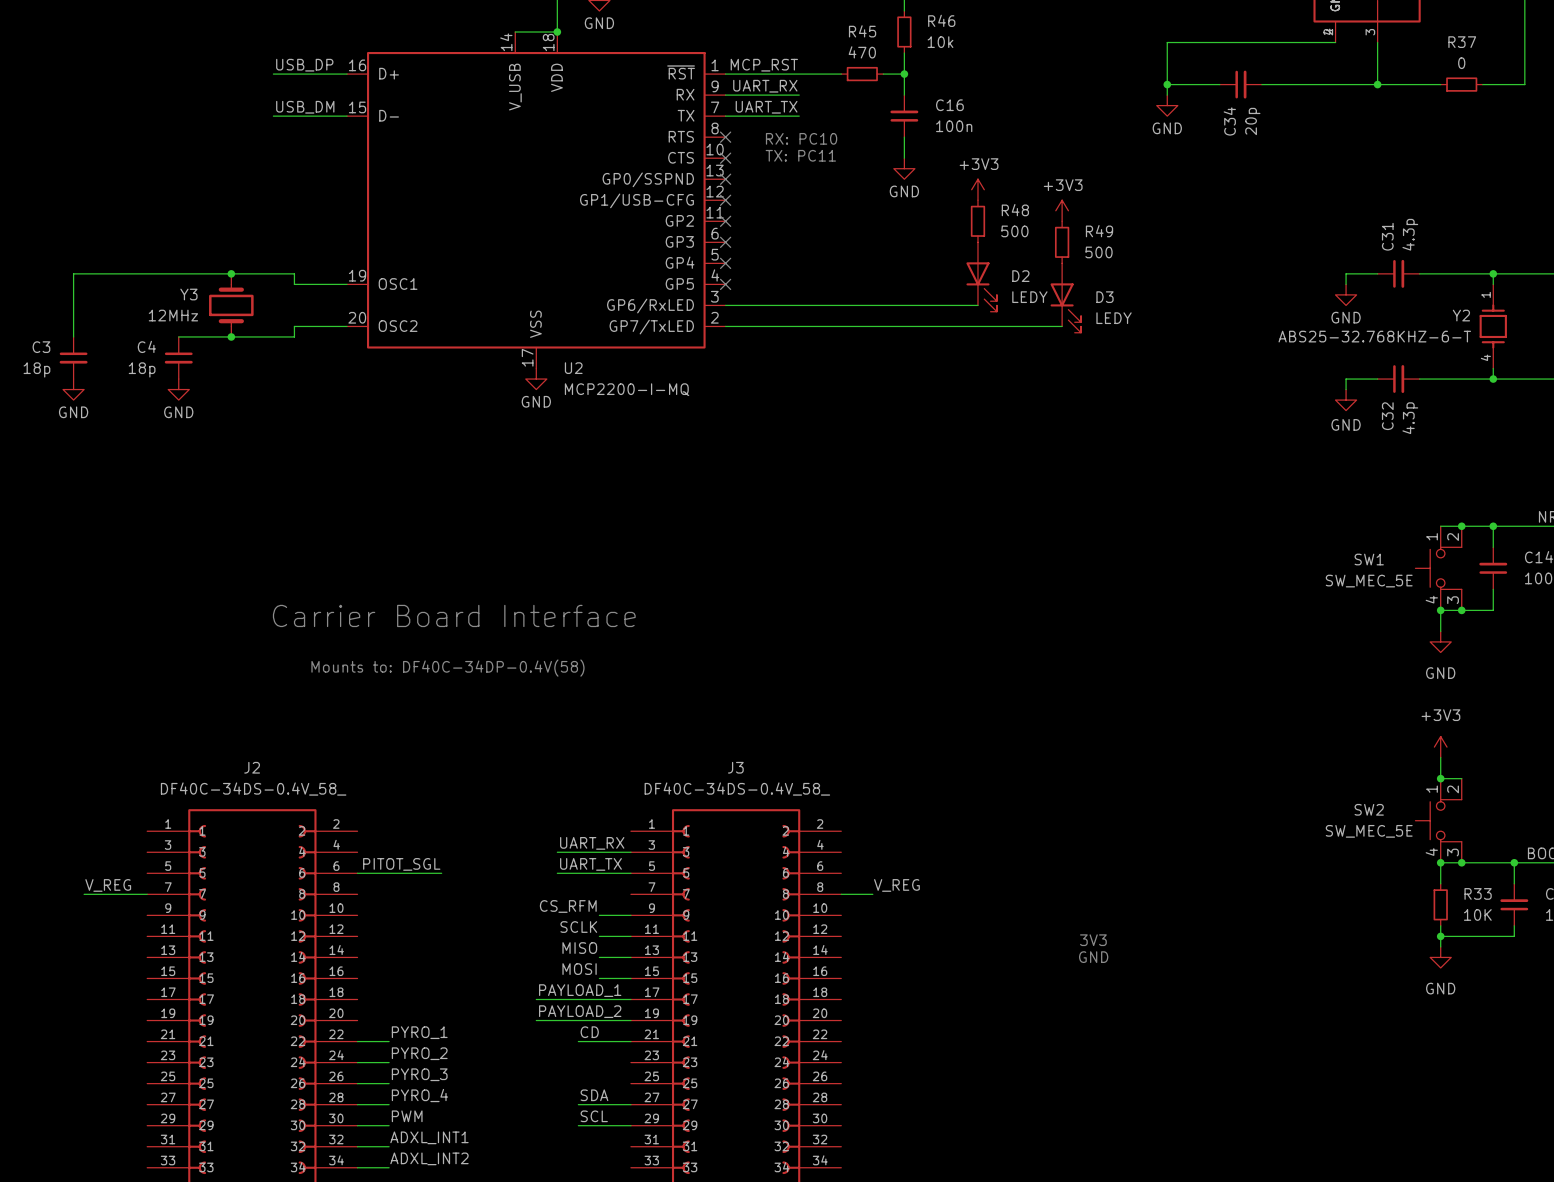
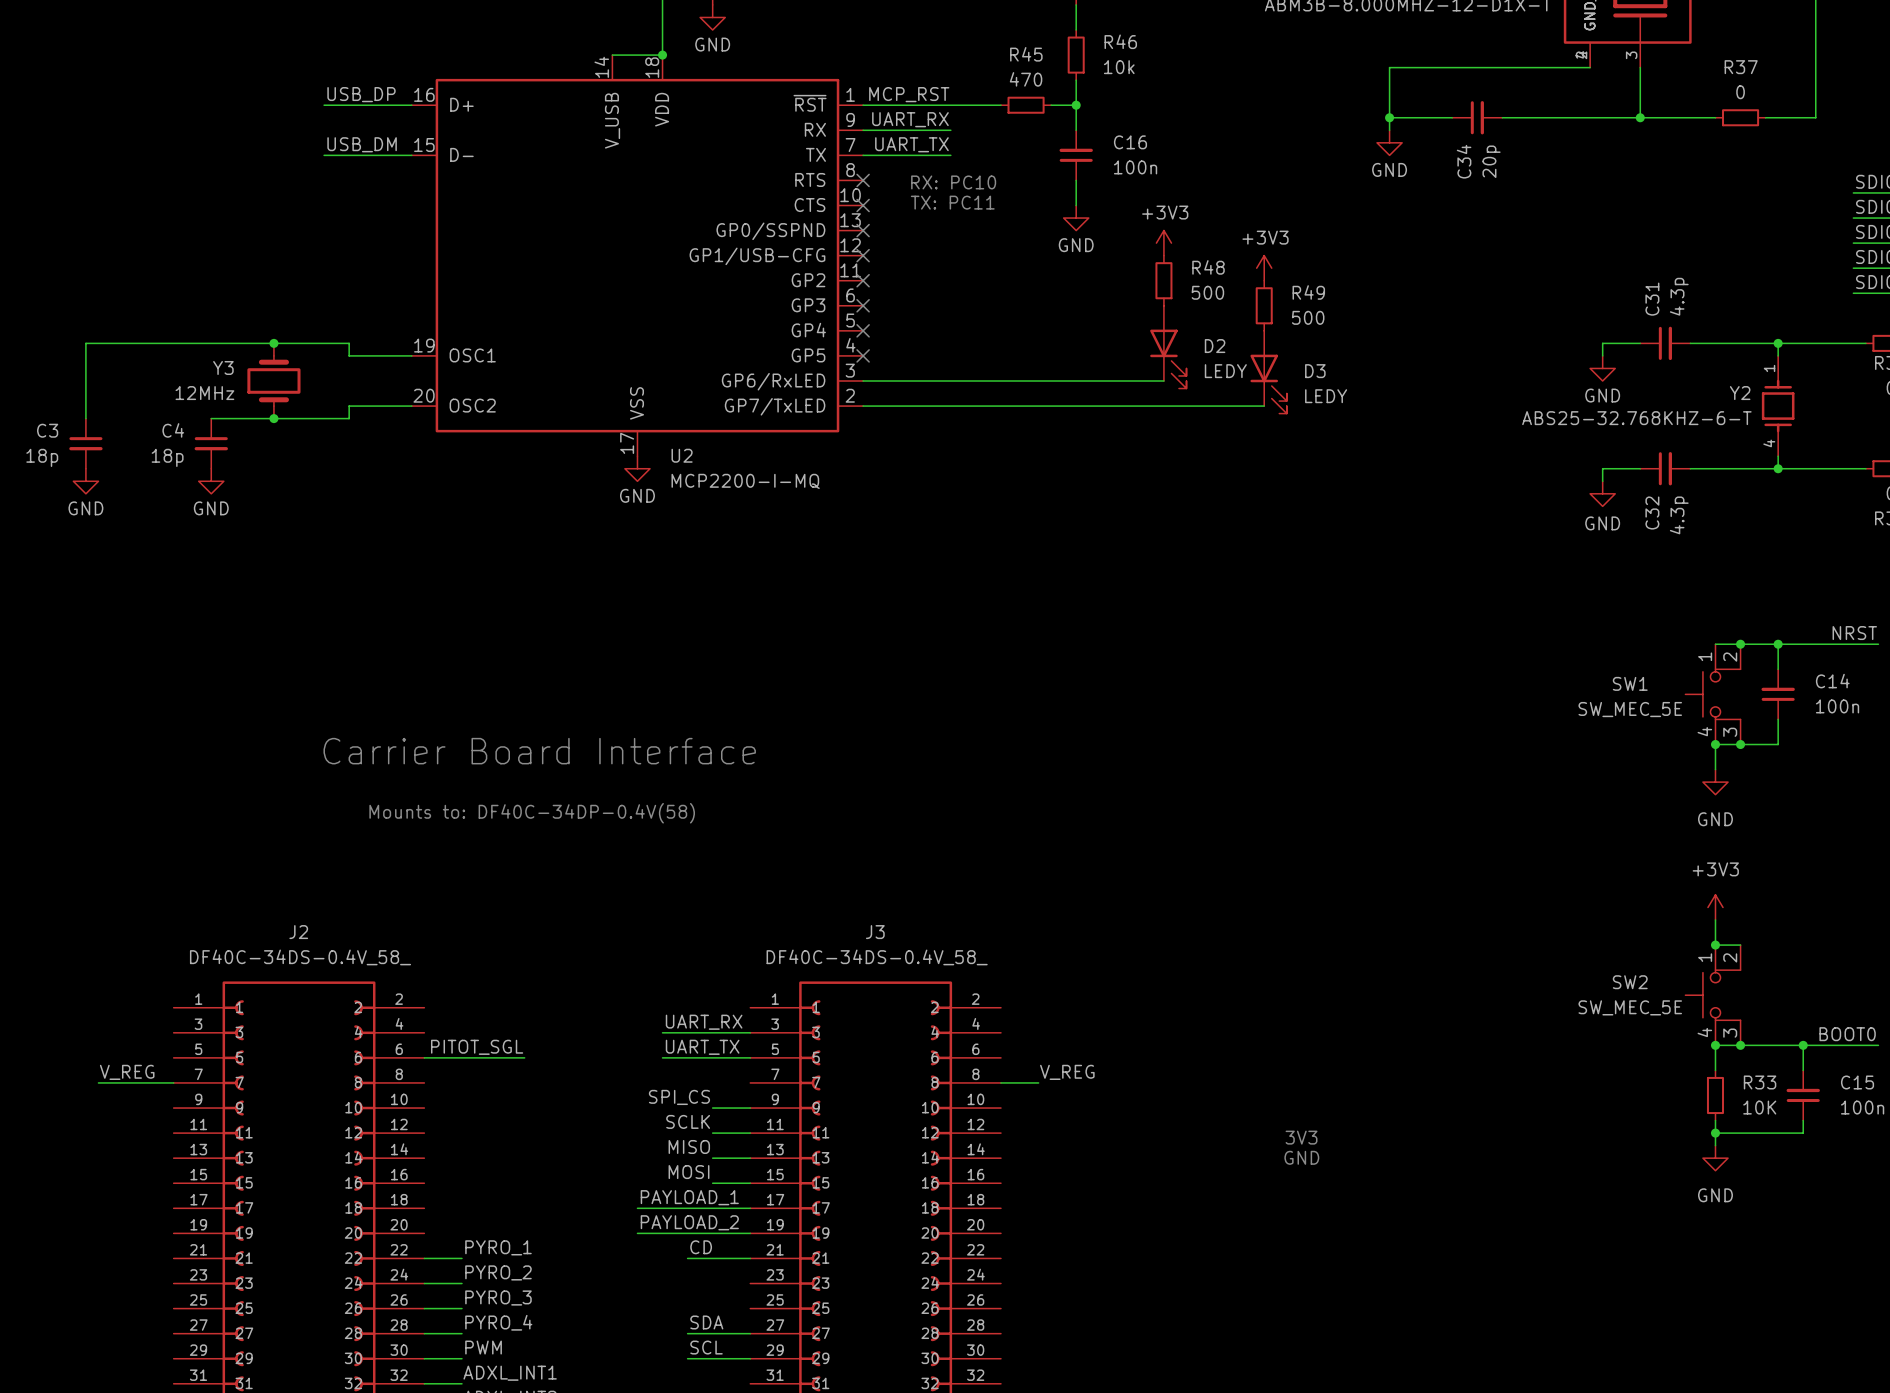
label: CS_RFM (568, 906) -> SPI_CS (679, 1097)

